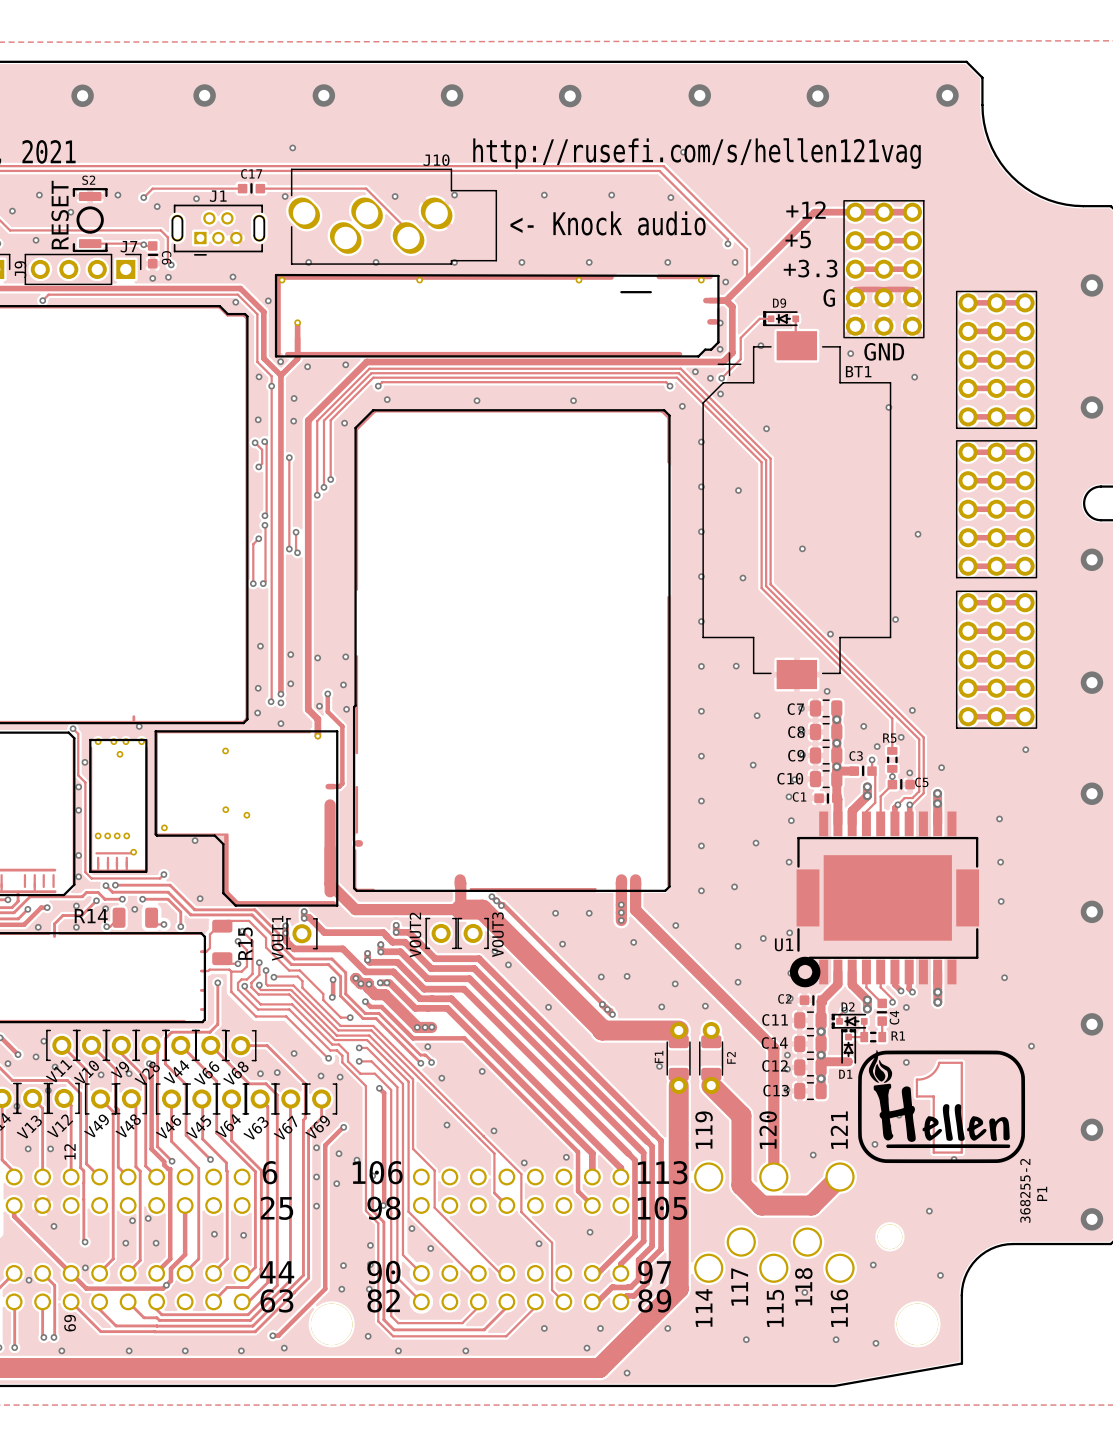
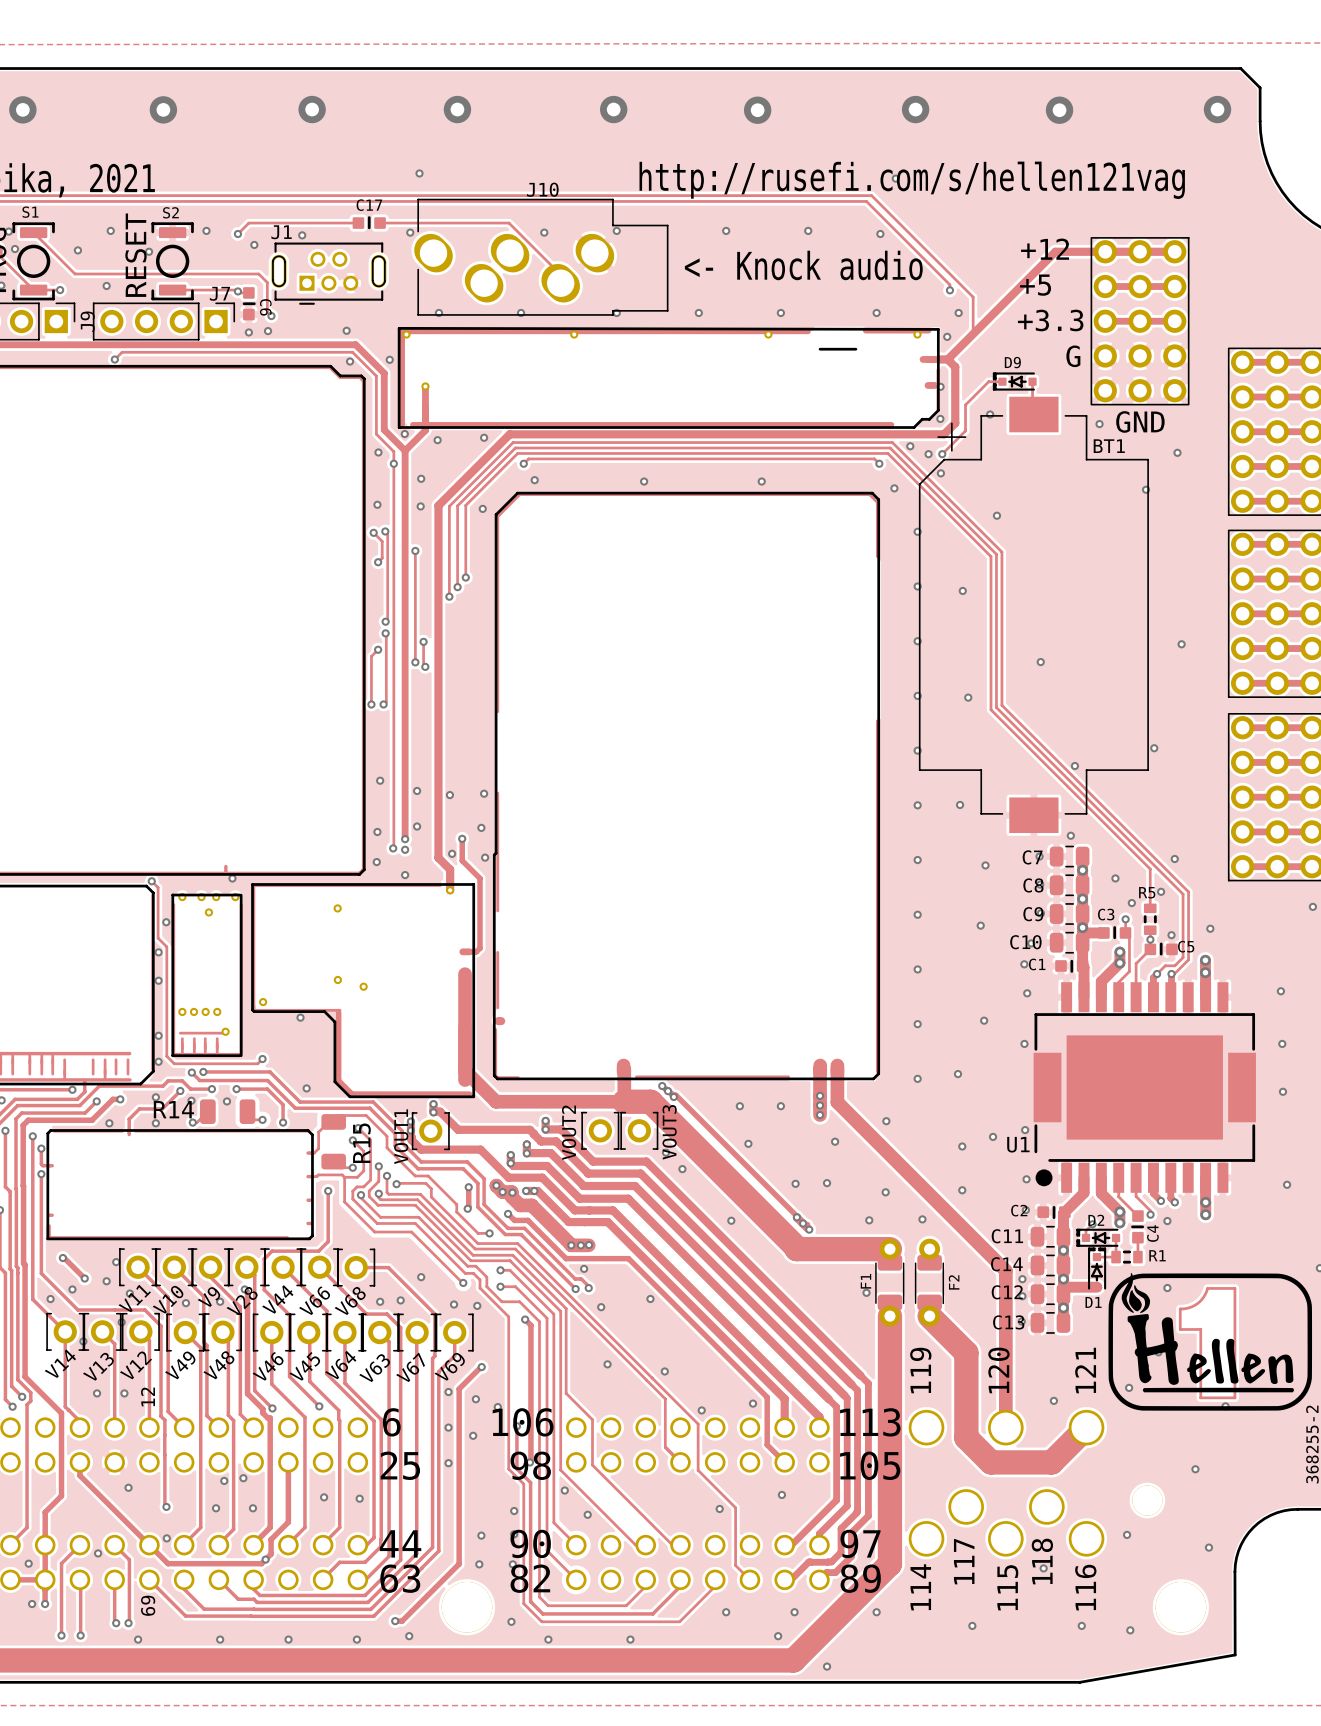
J10 name position: J10 (436, 160) -> J10 (542, 189)
J1 name position: J1 (218, 196) -> J1 (281, 232)
track: (855, 289) (912, 289) -> none
U1 footprint: [789, 811, 980, 988] -> [1033, 982, 1256, 1193]

